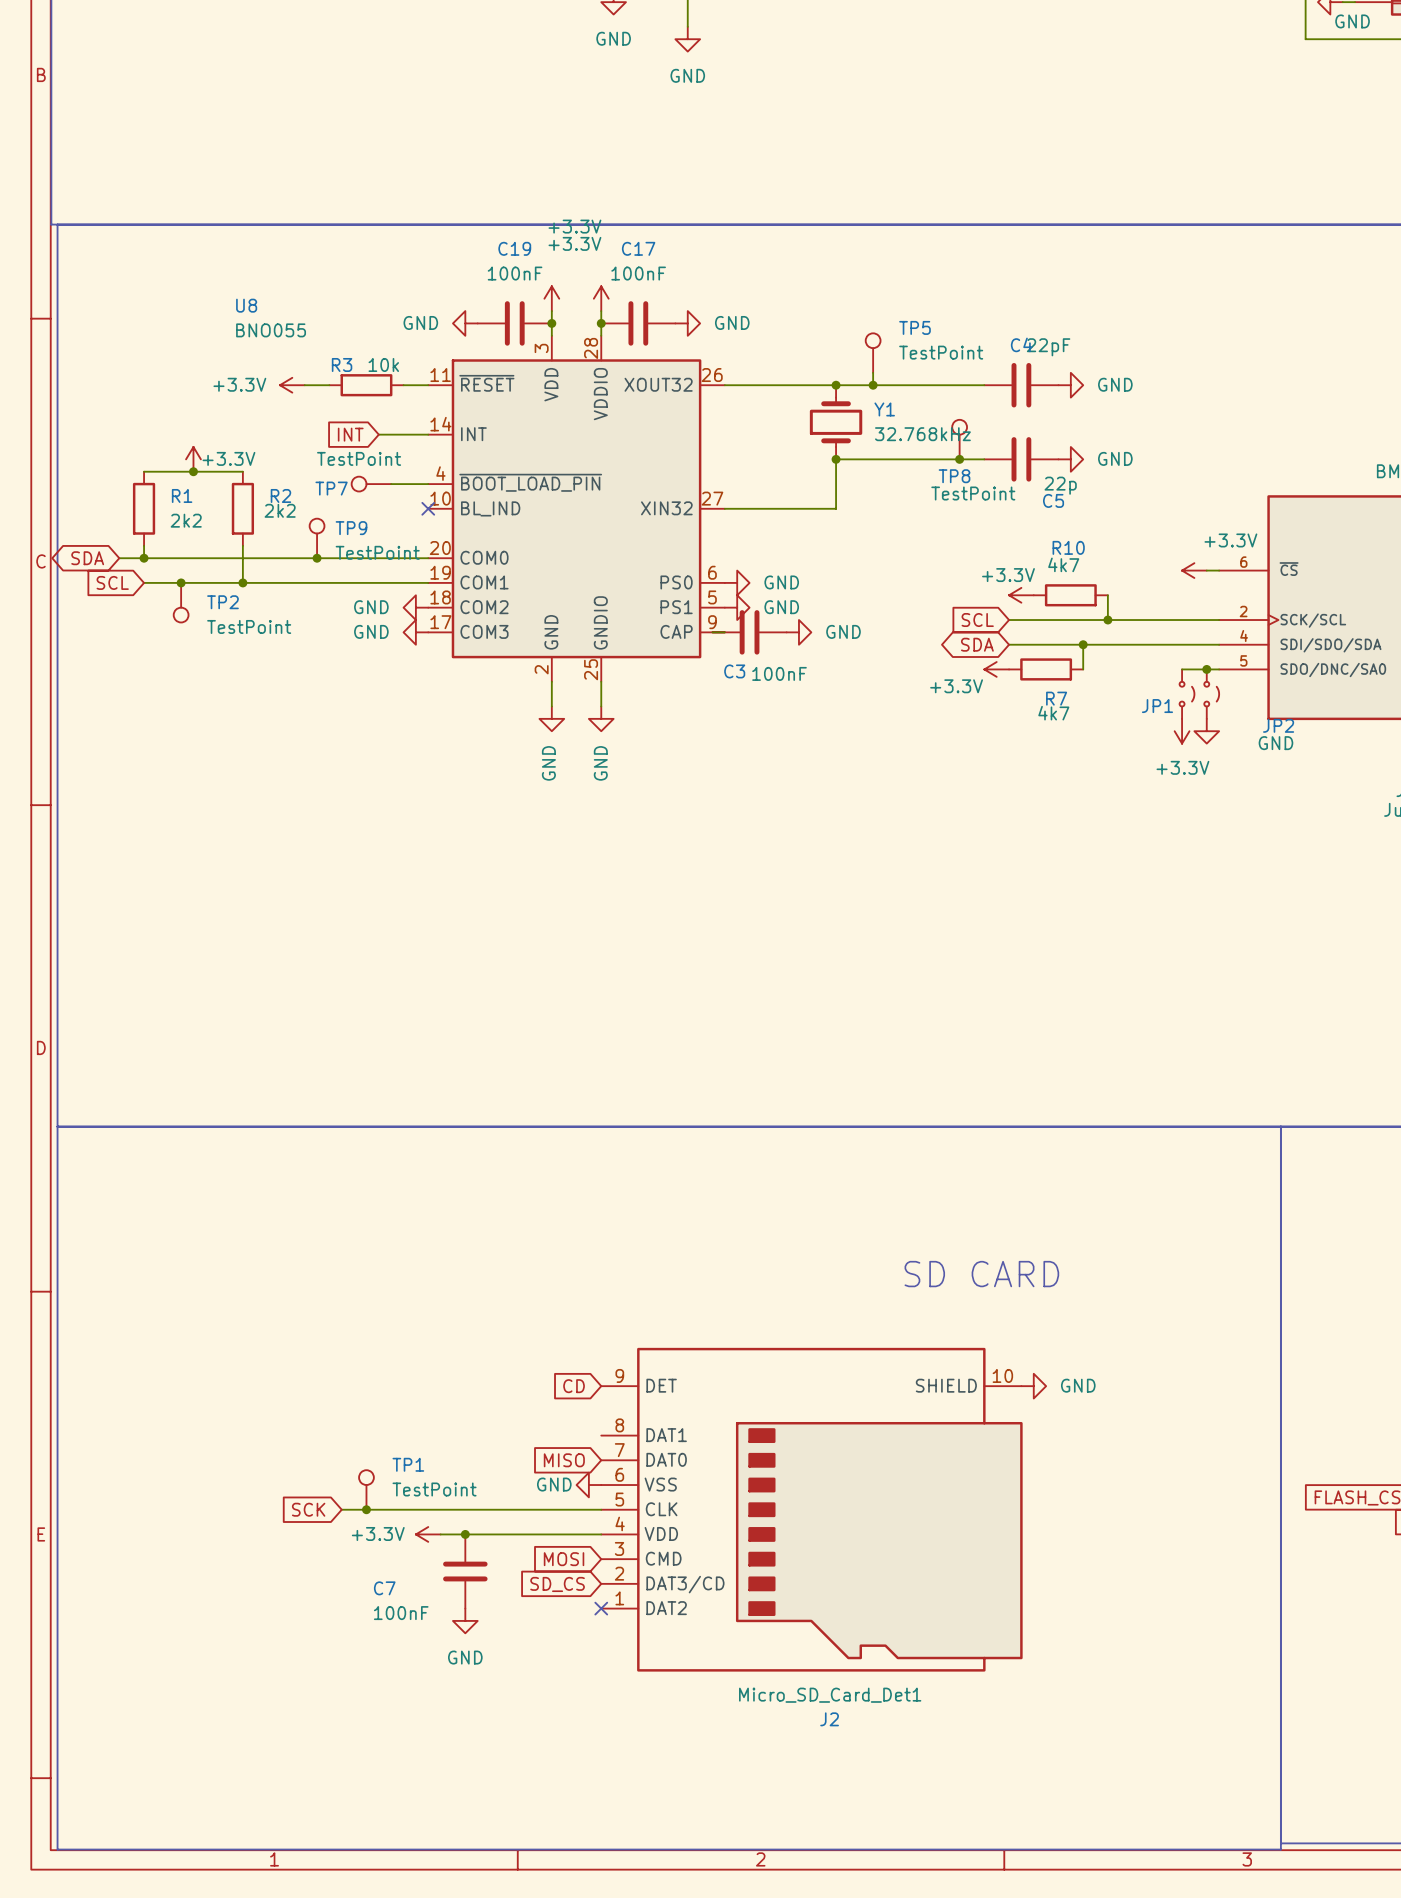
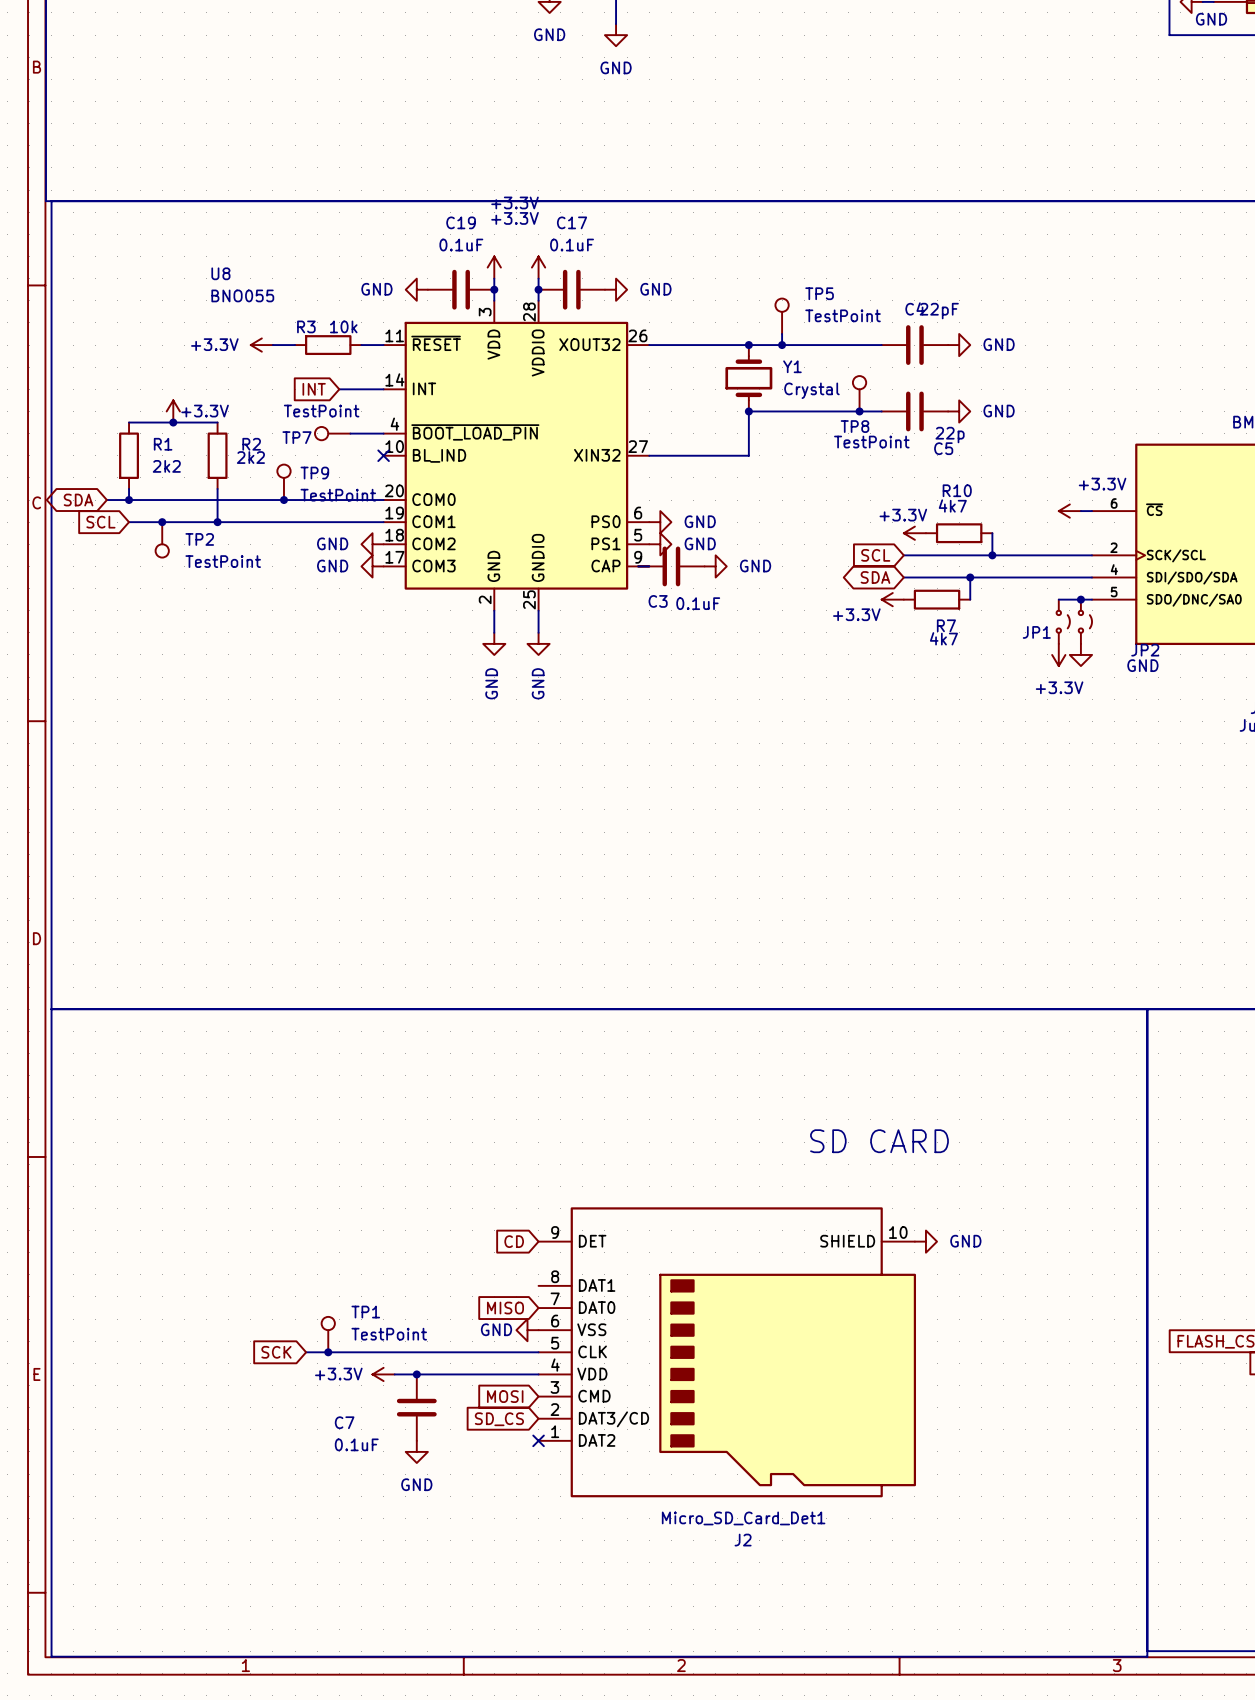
C19 value: 100nF (515, 273) -> 0.1uF (461, 245)
C17 value: 100nF (638, 273) -> 0.1uF (572, 245)
Y1 value: 32.768kHz (922, 434) -> Crystal (811, 390)
C3 value: 100nF (779, 673) -> 0.1uF (698, 603)
C7 value: 100nF (401, 1613) -> 0.1uF (356, 1444)

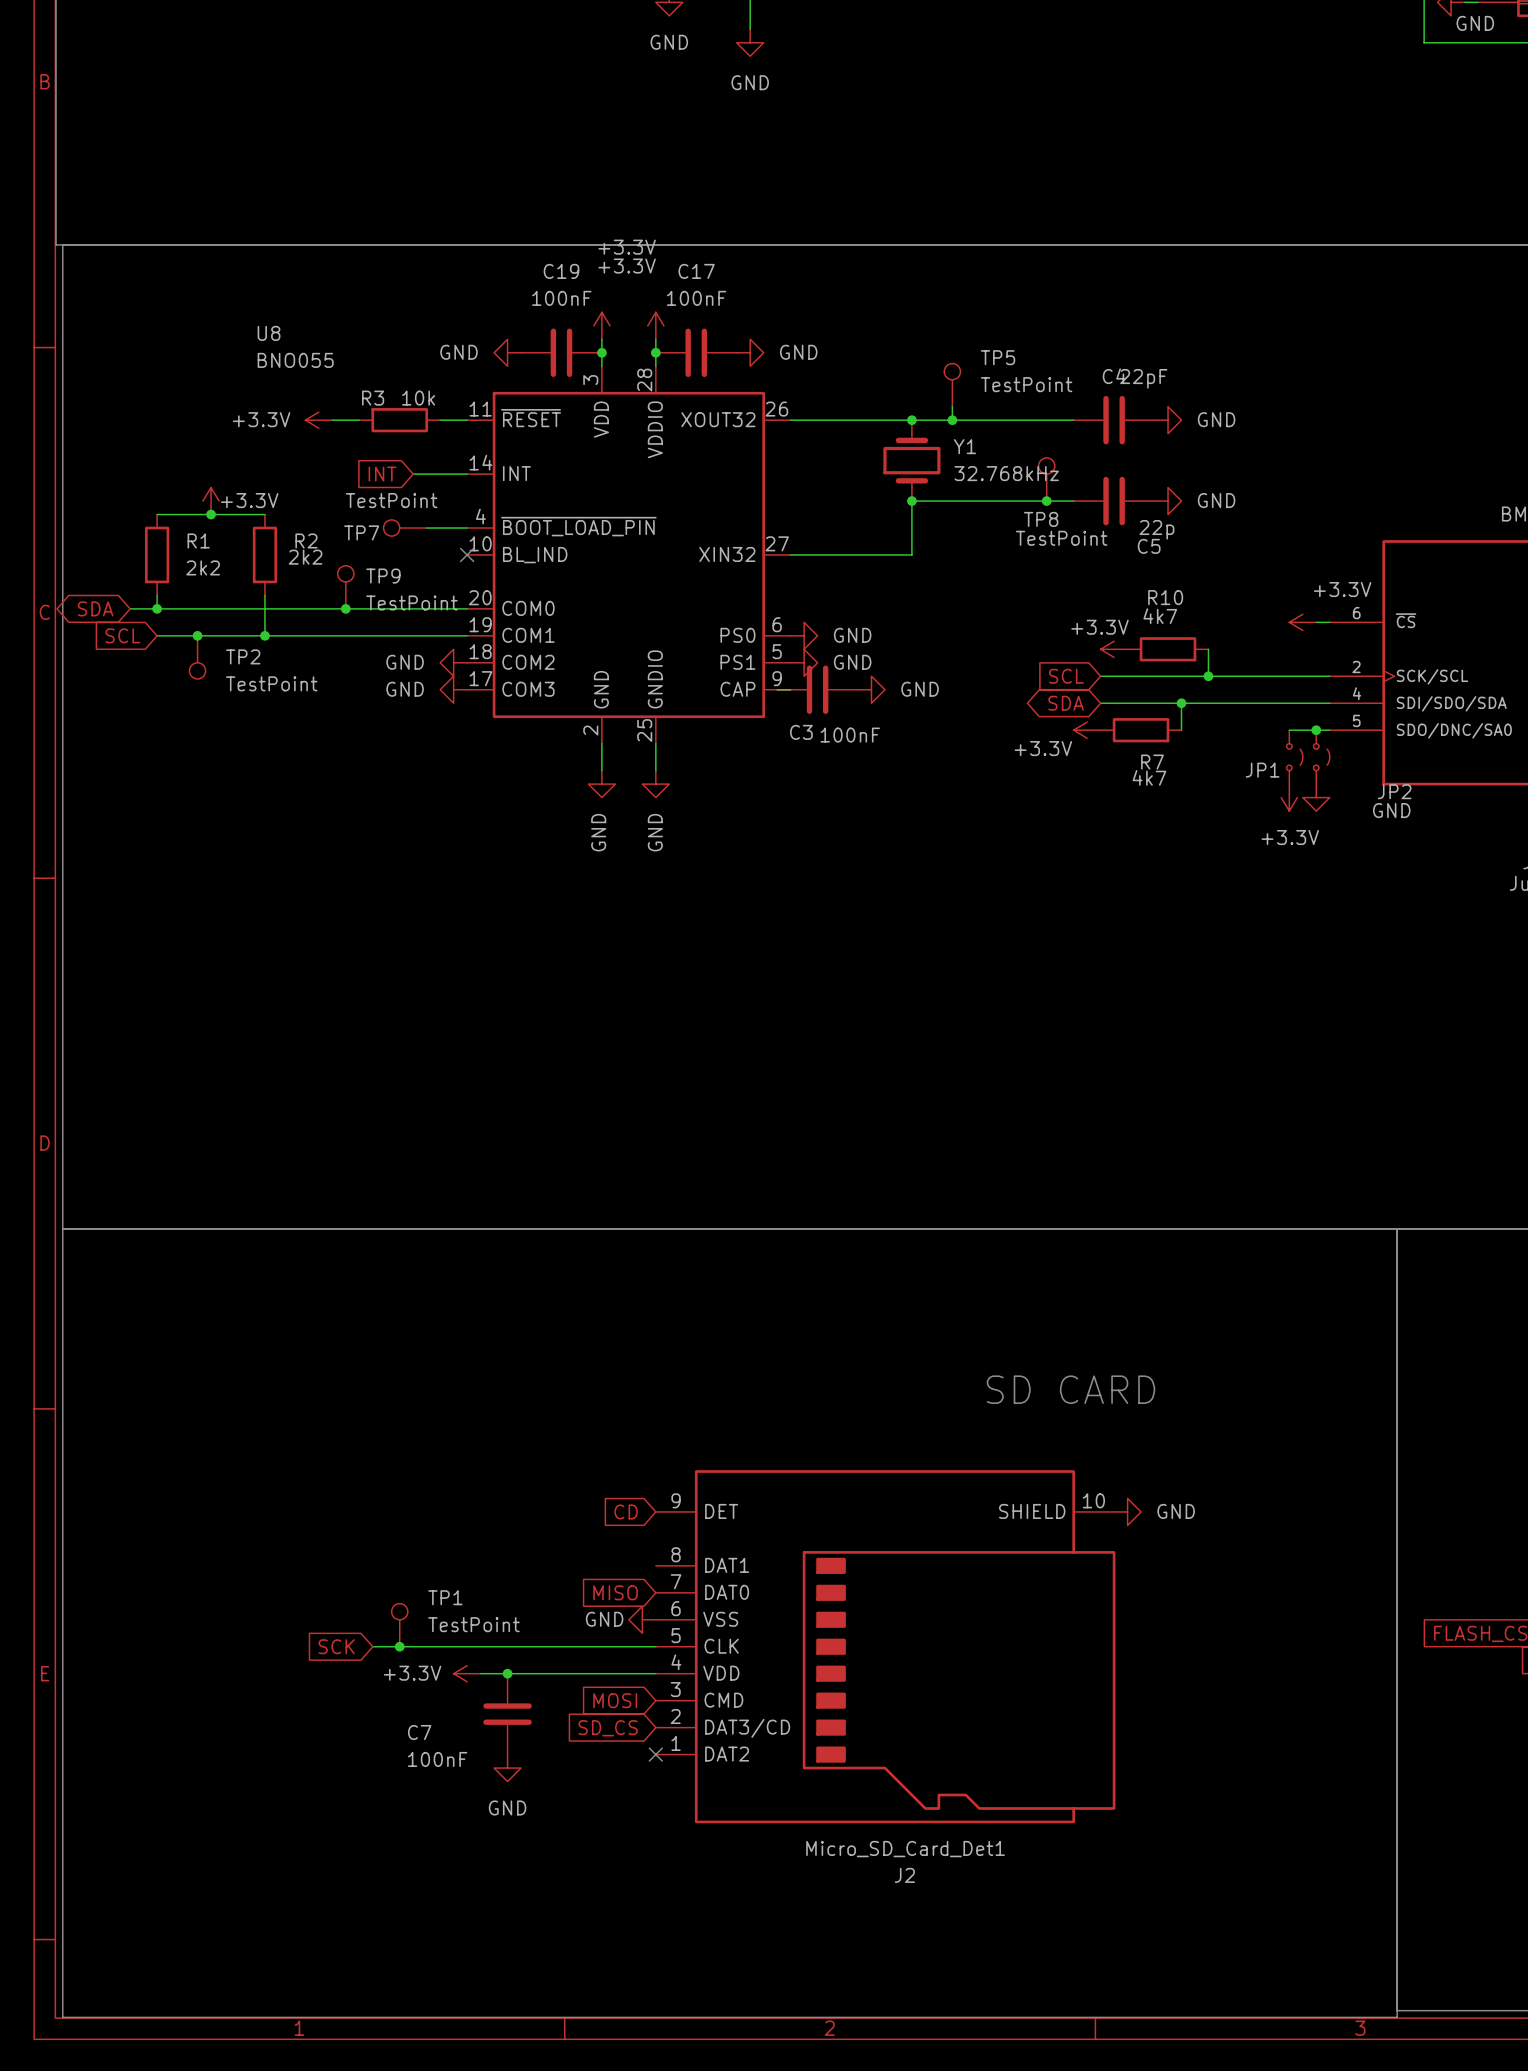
C19 value: 0.1uF (461, 245) -> 100nF (561, 298)
C17 value: 0.1uF (572, 245) -> 100nF (696, 298)
Y1 value: Crystal (811, 390) -> 32.768kHz (1006, 473)
C3 value: 0.1uF (698, 603) -> 100nF (850, 735)
C7 value: 0.1uF (356, 1444) -> 100nF (437, 1759)

